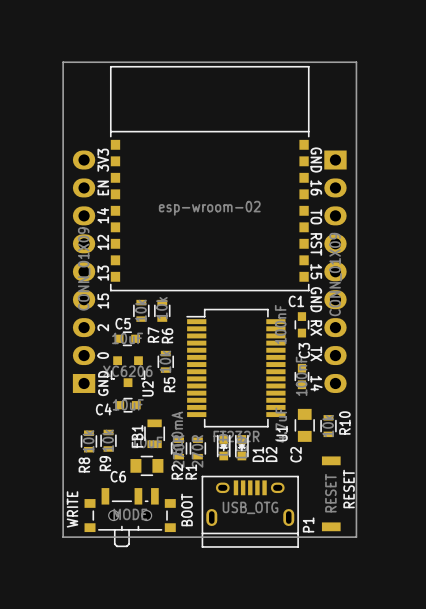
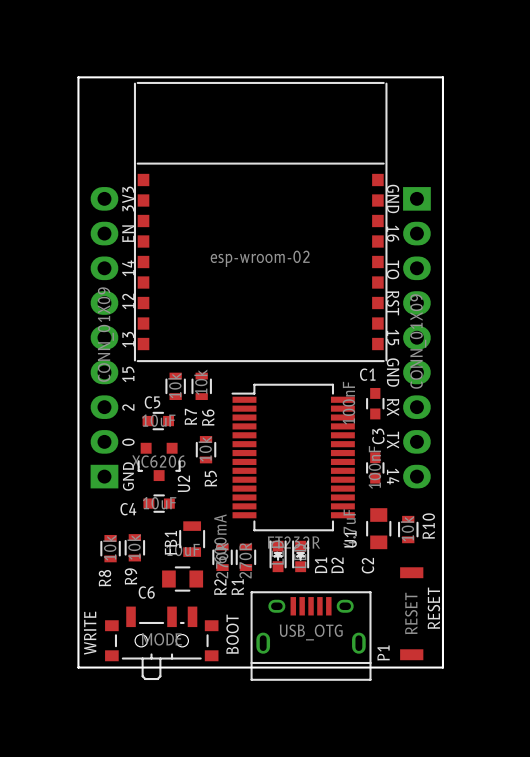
part footprint: [109, 65, 310, 292] -> [133, 81, 388, 363]

